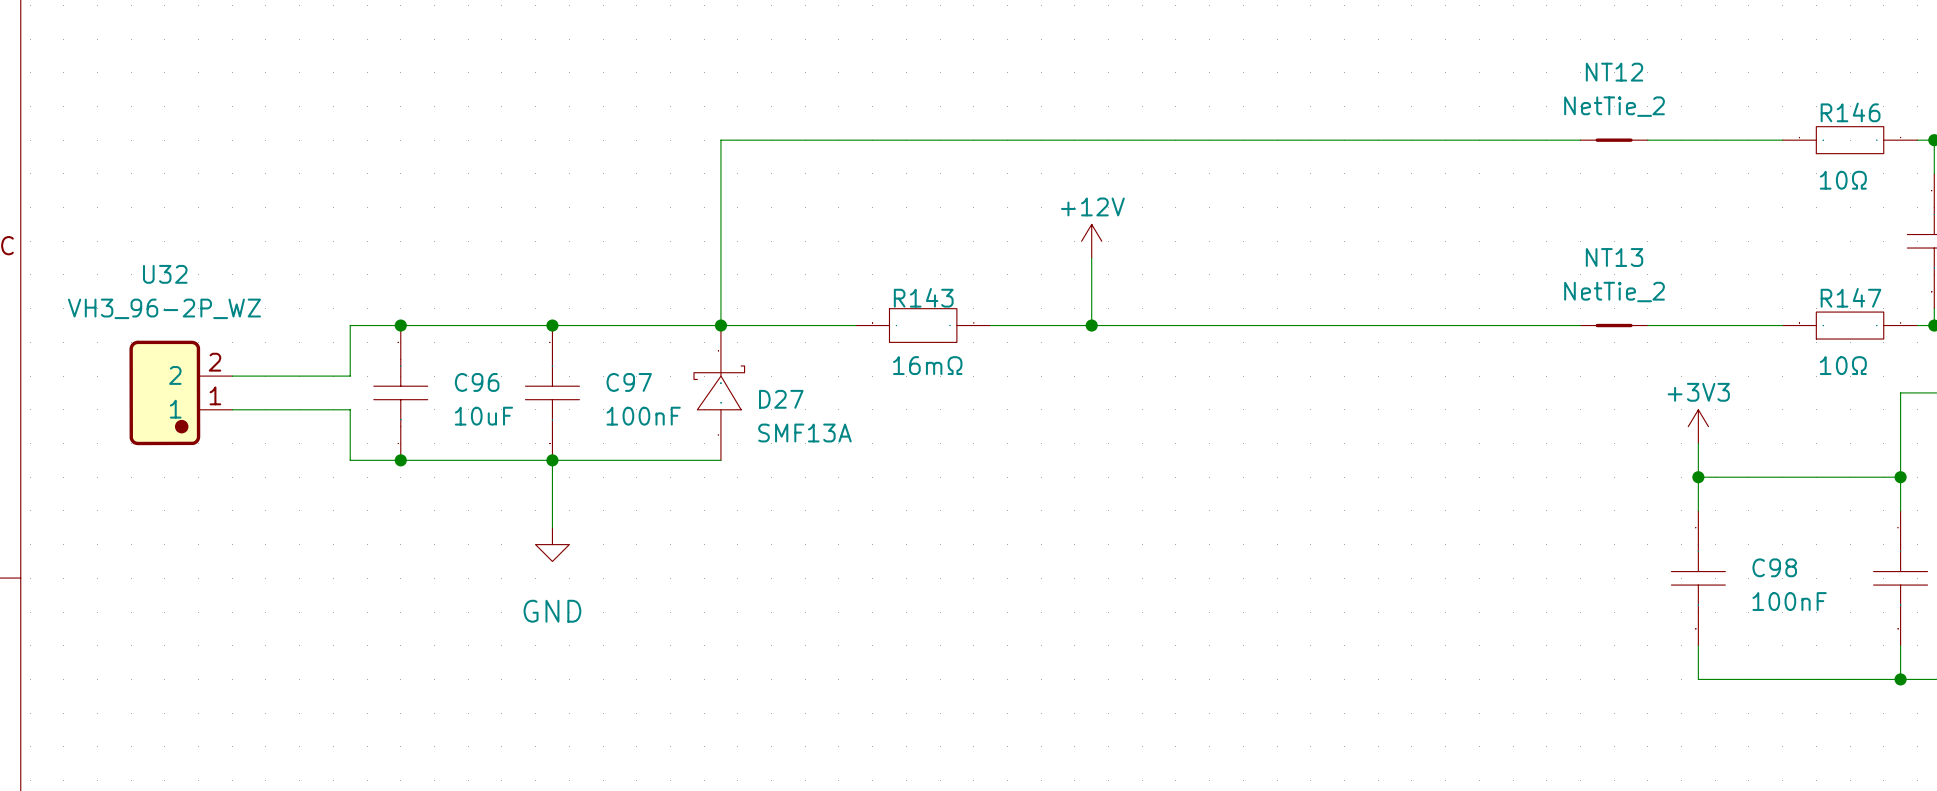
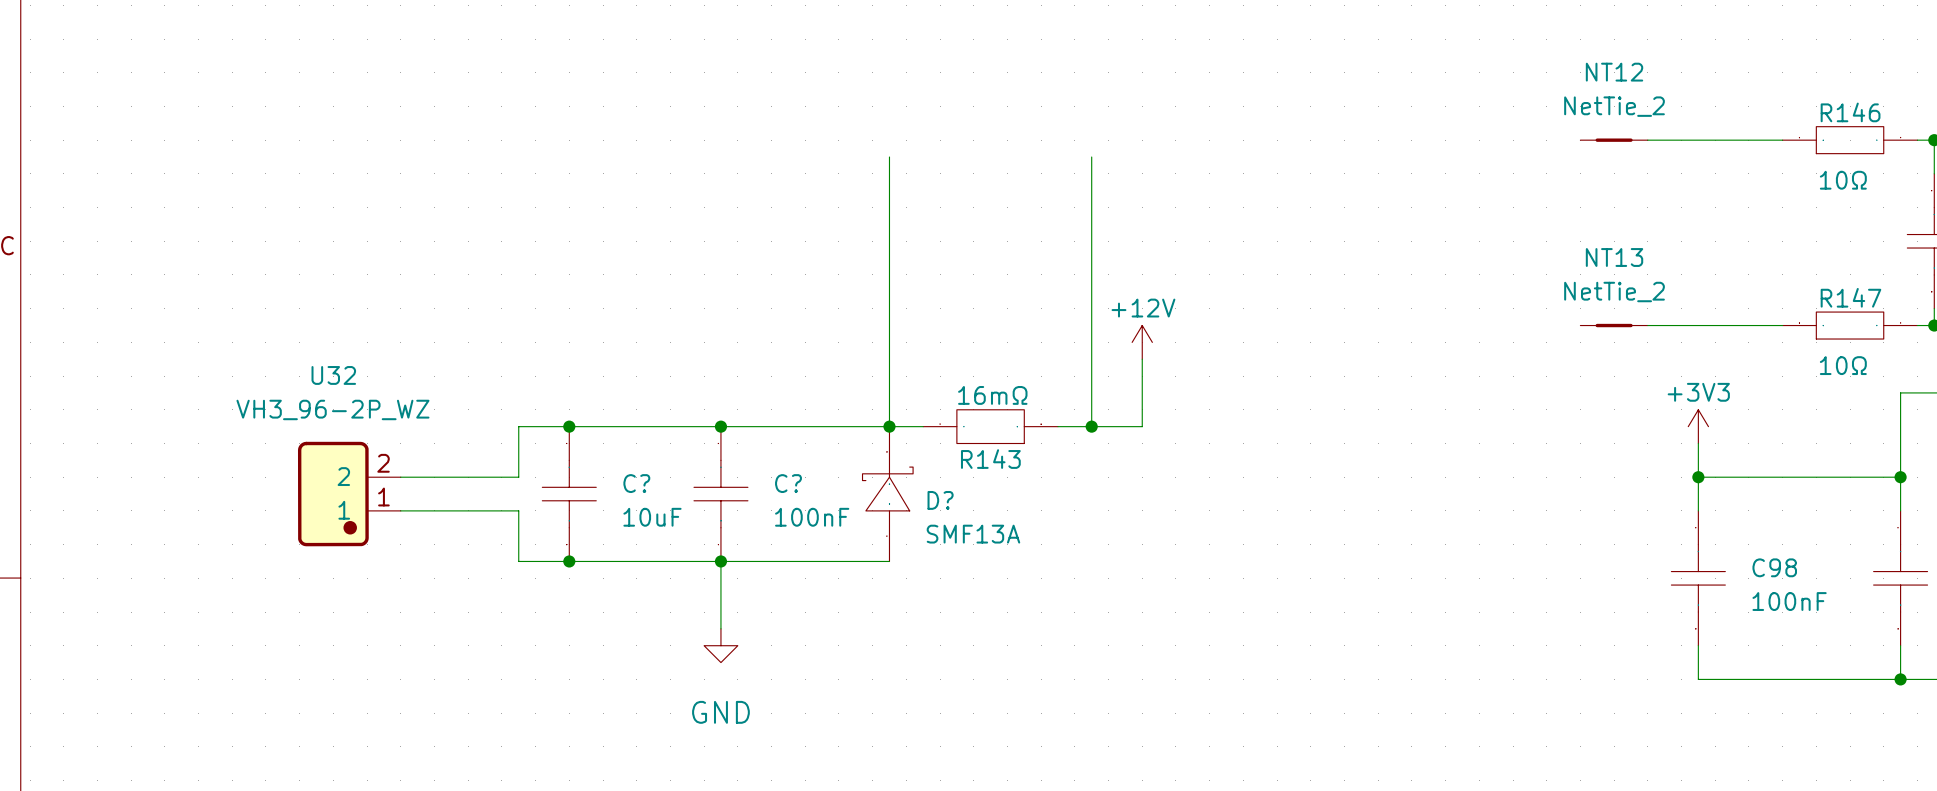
wire: (1580, 140) (720, 140) (720, 325) -> none
wire: none -> (889, 157) (889, 426)
wire: none -> (1091, 157) (1091, 258)
power symbol position: +12V (1091, 241) -> +12V (1142, 342)
junction: (400, 325) -> none
junction: (552, 325) -> none
junction: (720, 325) -> none
wire: (855, 325) (350, 325) (350, 376) (232, 376) -> none
R143 rotation: 0° (923, 325) -> 180° (990, 426)
R143 position: (923, 325) -> (990, 426)
wire: (990, 325) (1580, 325) -> none
wire: none -> (1091, 325) (1091, 426)
junction: (1091, 325) -> none
wire: none -> (1142, 359) (1142, 426) (1058, 426)
U32 position: (180, 392) -> (349, 494)
C96: 10uF (400, 392) -> none
C97: 100nF (552, 392) -> none
D27: SMF13A (719, 392) -> none
wire: (232, 409) (350, 409) (350, 460) (720, 460) -> (400, 510) (518, 510) (518, 561) (889, 561)
junction: none -> (720, 426)
junction: none -> (889, 426)
wire: none -> (923, 426) (518, 426) (518, 477) (400, 477)
junction: none -> (1091, 426)
junction: (400, 460) -> none
wire: (552, 460) (552, 527) -> (720, 561) (720, 628)
junction position: (552, 460) -> (569, 426)
C?: none -> 10uF (569, 494)
C?: none -> 100nF (720, 494)
D?: none -> SMF13A (887, 494)
power symbol position: GND (552, 544) -> GND (720, 645)
junction: none -> (569, 561)
junction: none -> (720, 561)

